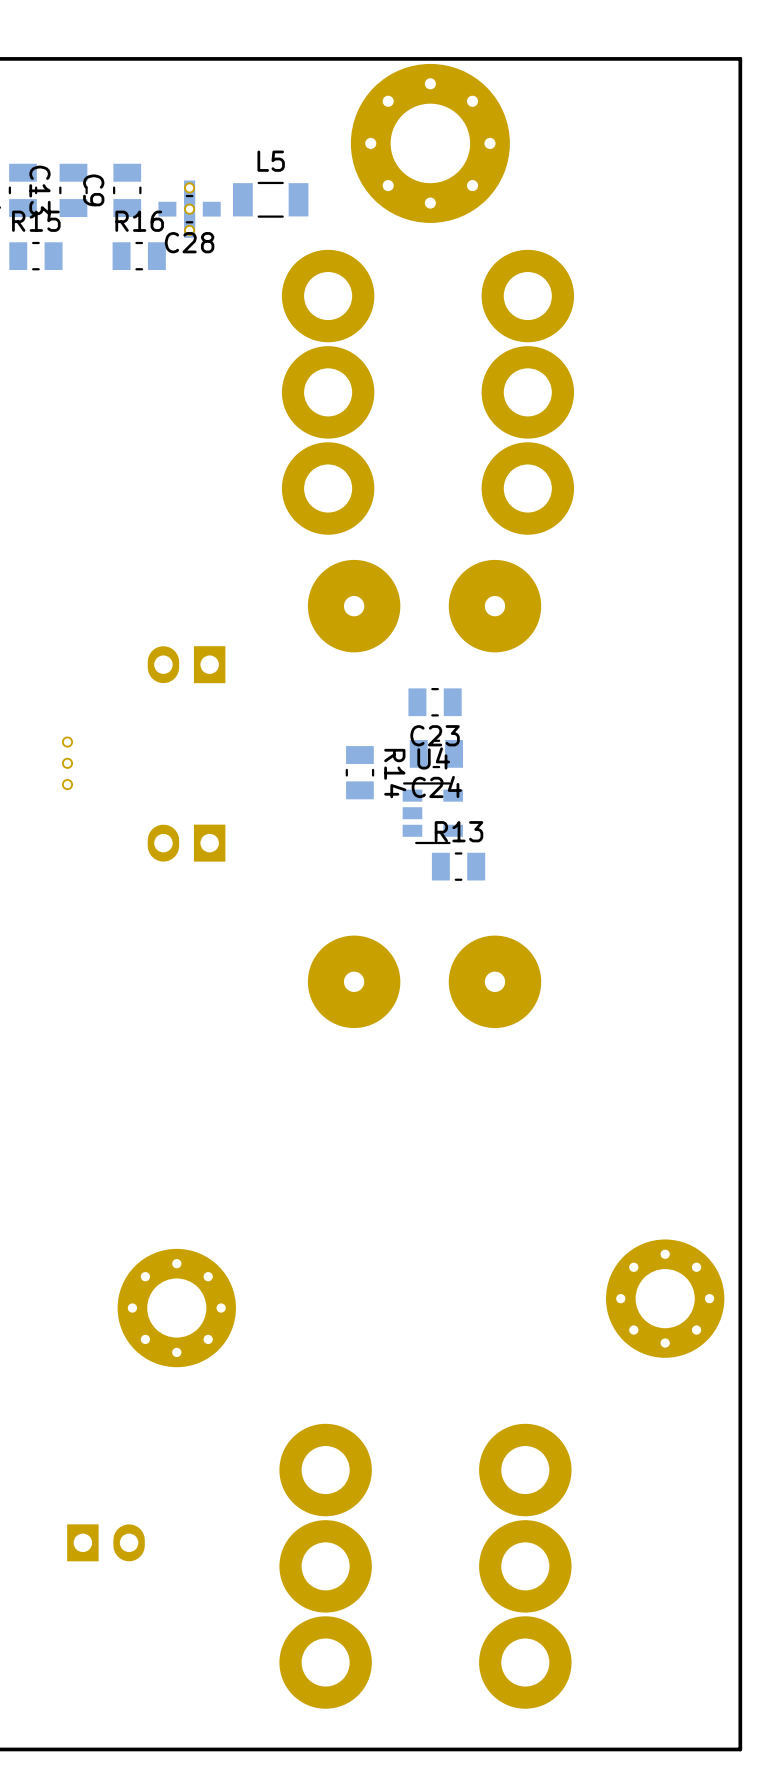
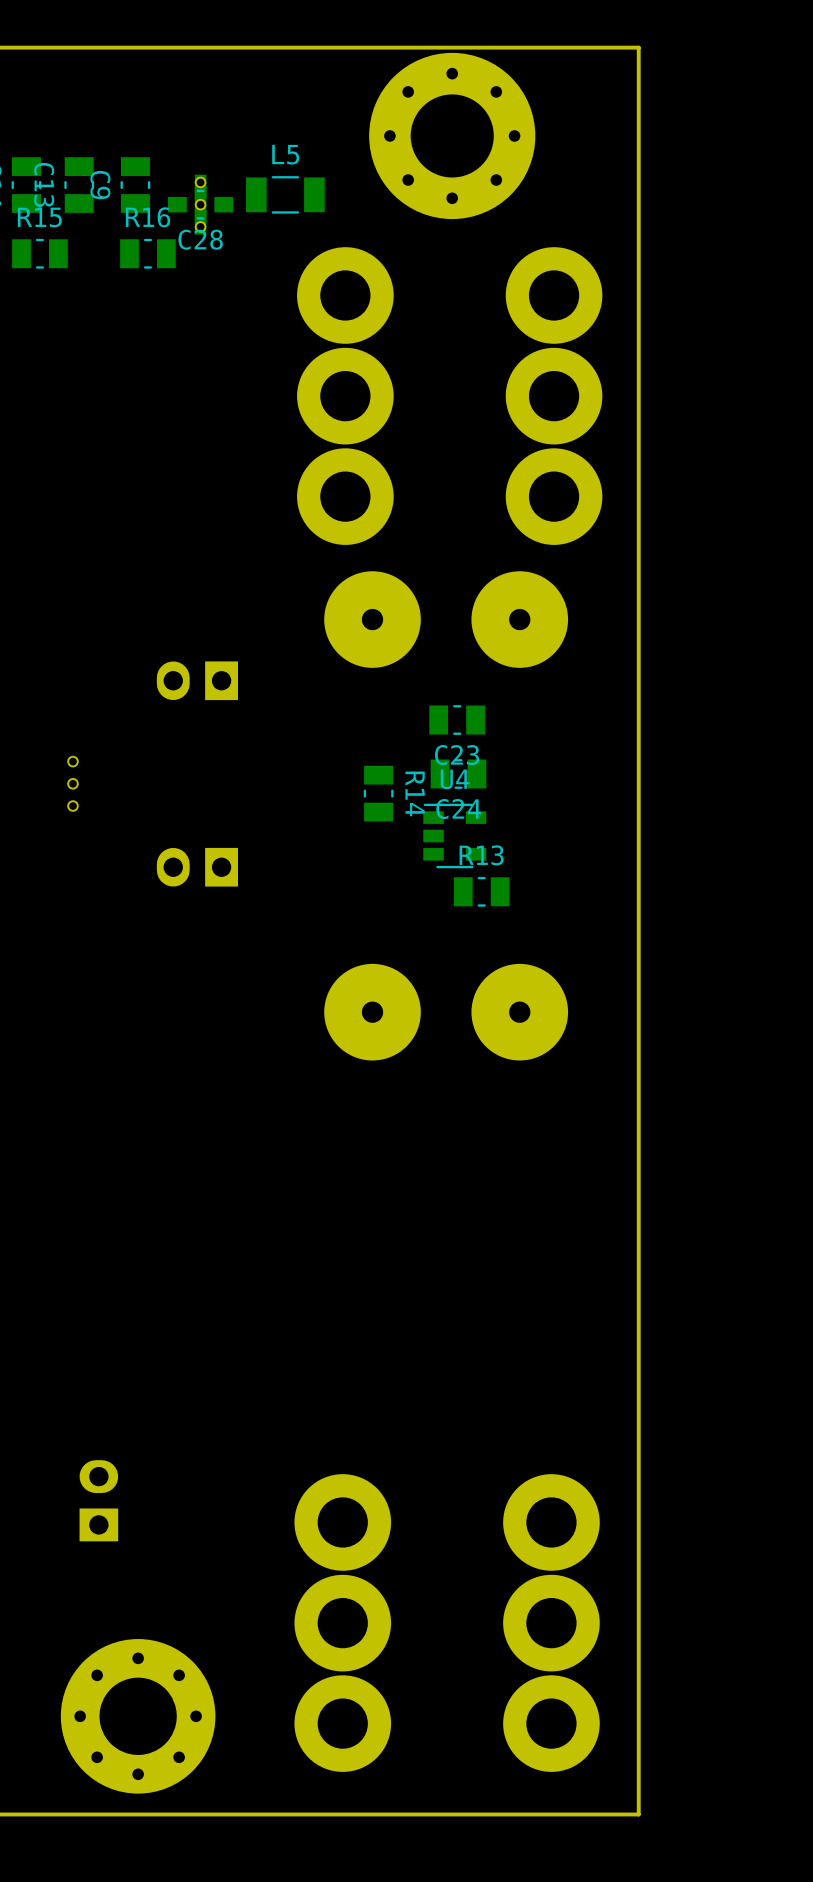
board edge: (608, 58) (740, 58) (740, 1749) (608, 1749) -> (638, 47) (638, 1814)
part: (665, 1298) -> none
part: (176, 1308) -> none
part rotation: 0° (105, 1542) -> 90° counterclockwise (98, 1500)
part position: (105, 1542) -> (98, 1500)
part: none -> (138, 1716)

